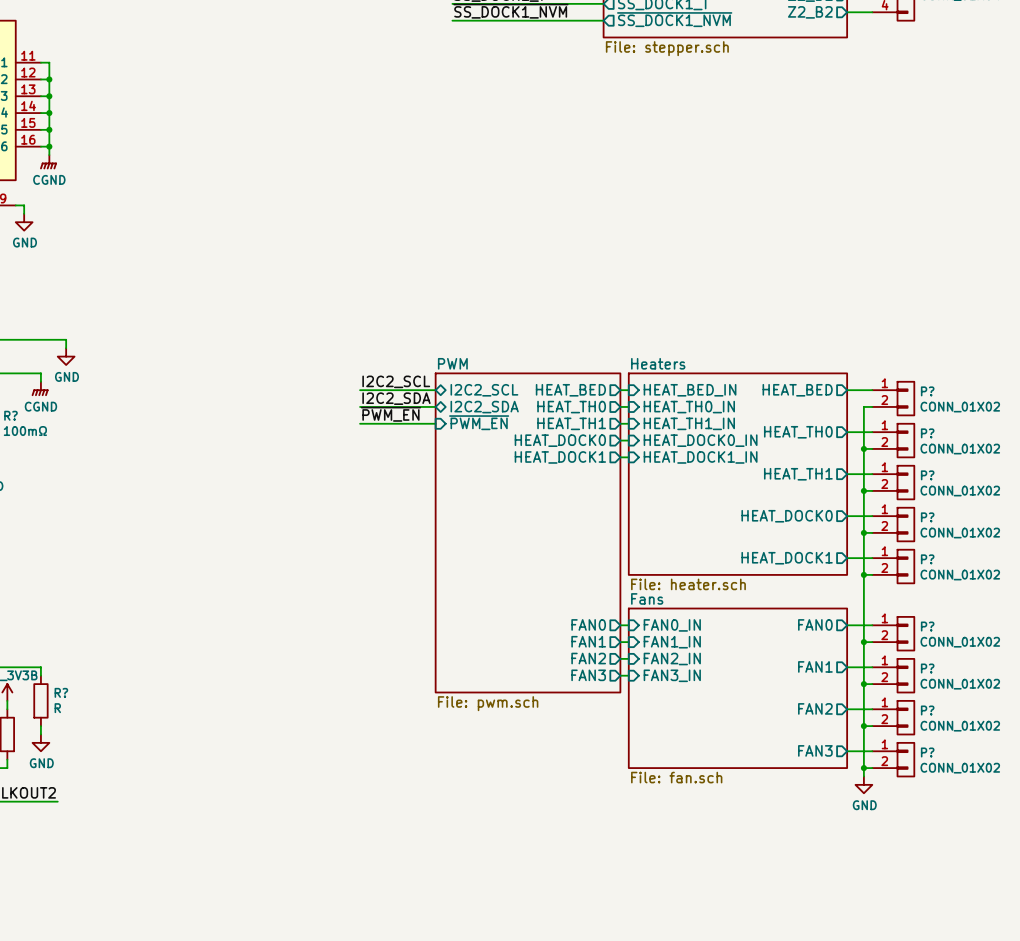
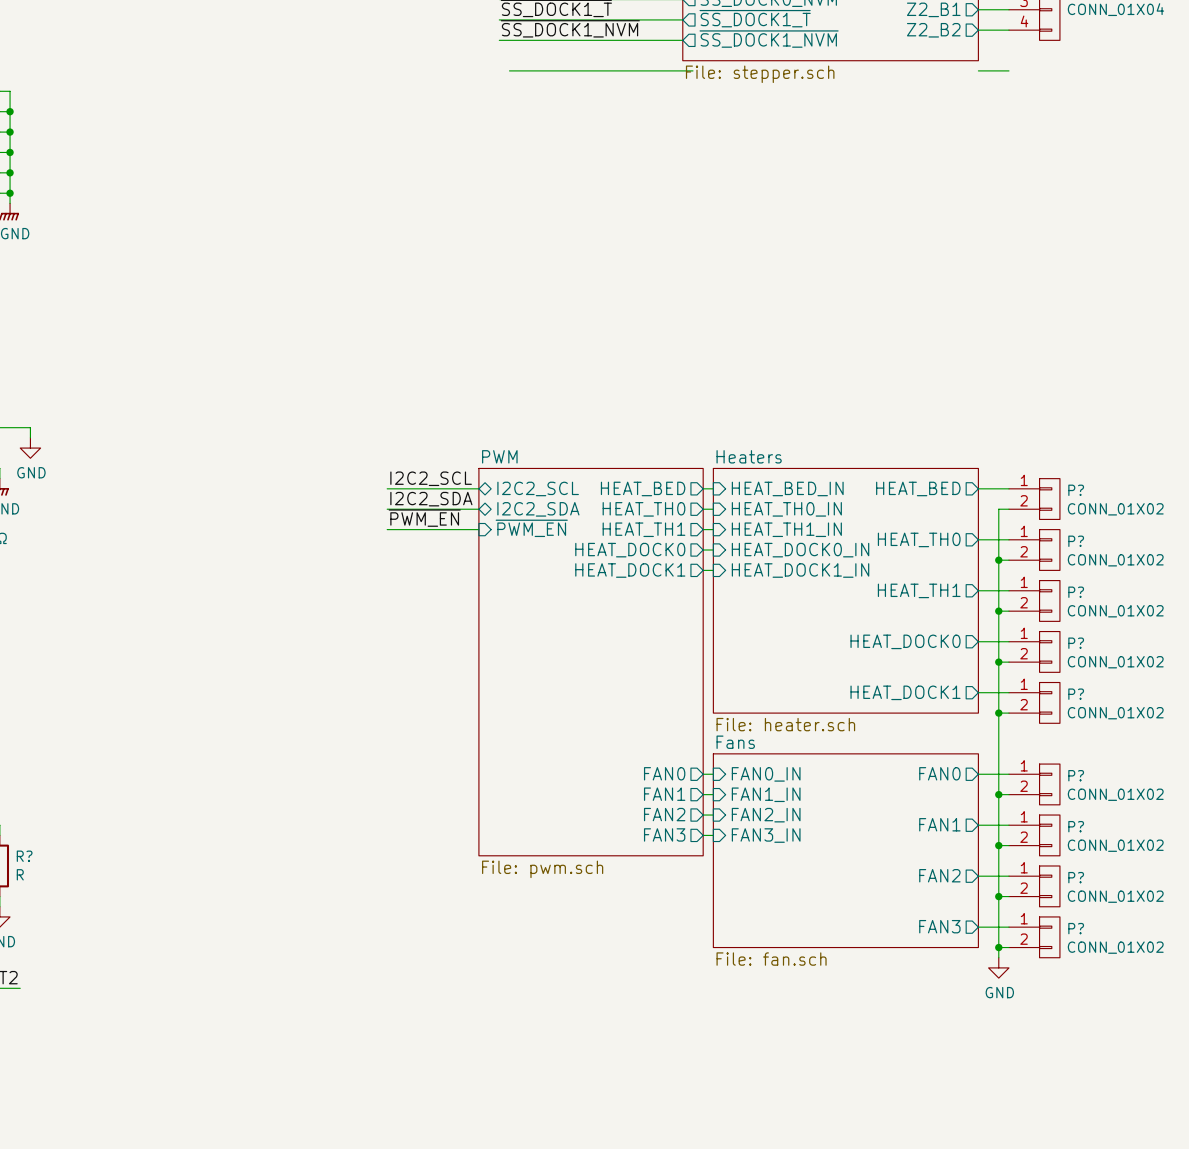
wire: none -> (509, 70) (692, 70)
wire: none -> (978, 70) (1008, 70)

